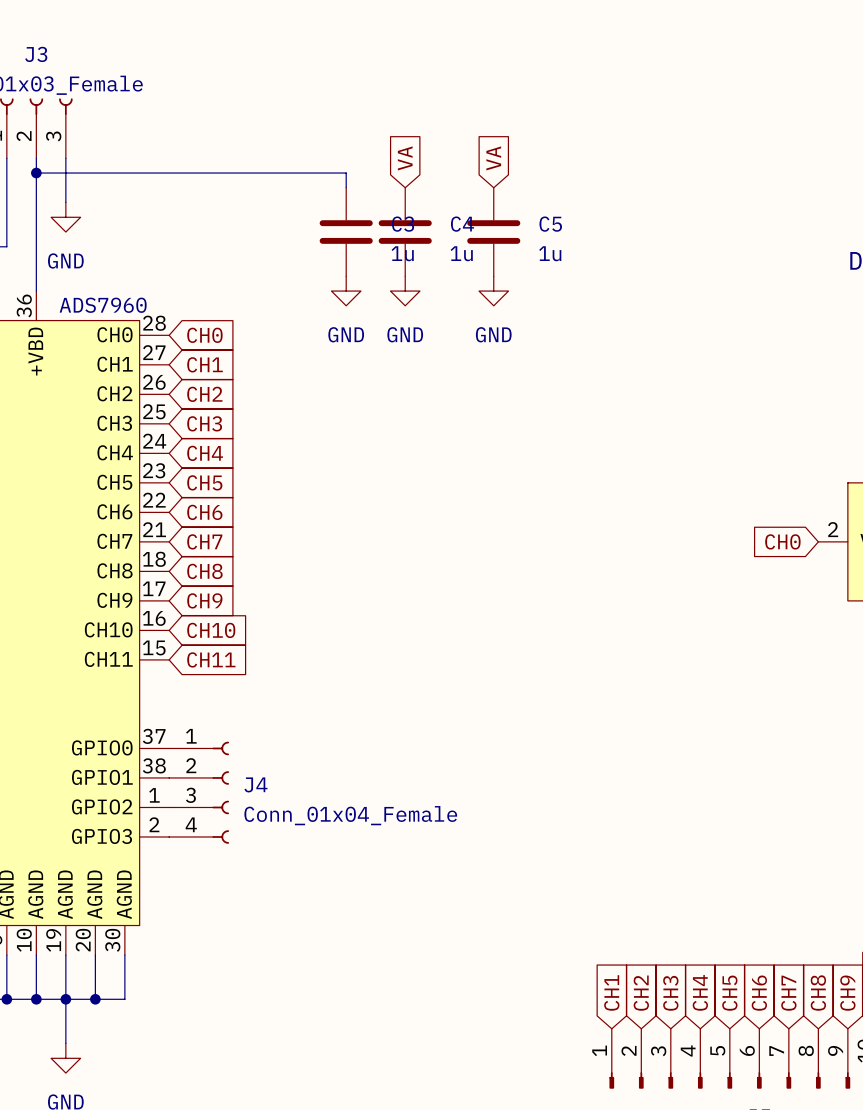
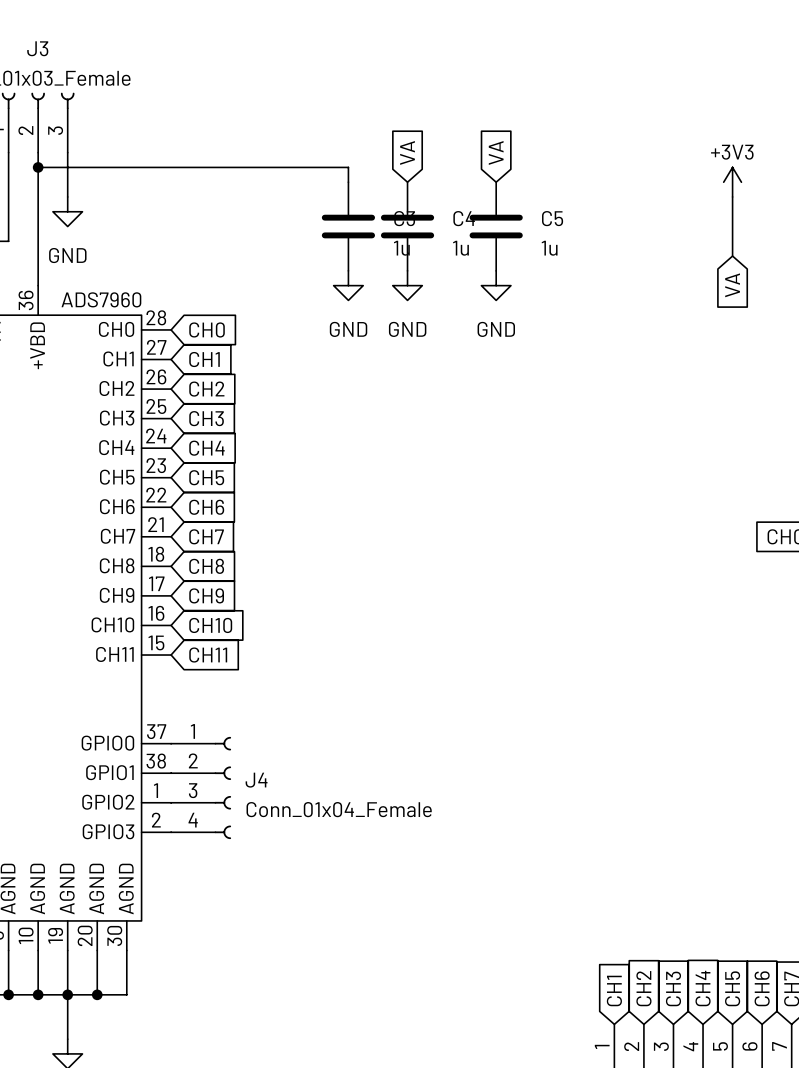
power symbol: none -> +3V3 (732, 182)
wire: none -> (732, 196) (732, 256)
global label: none -> VA (732, 285)

